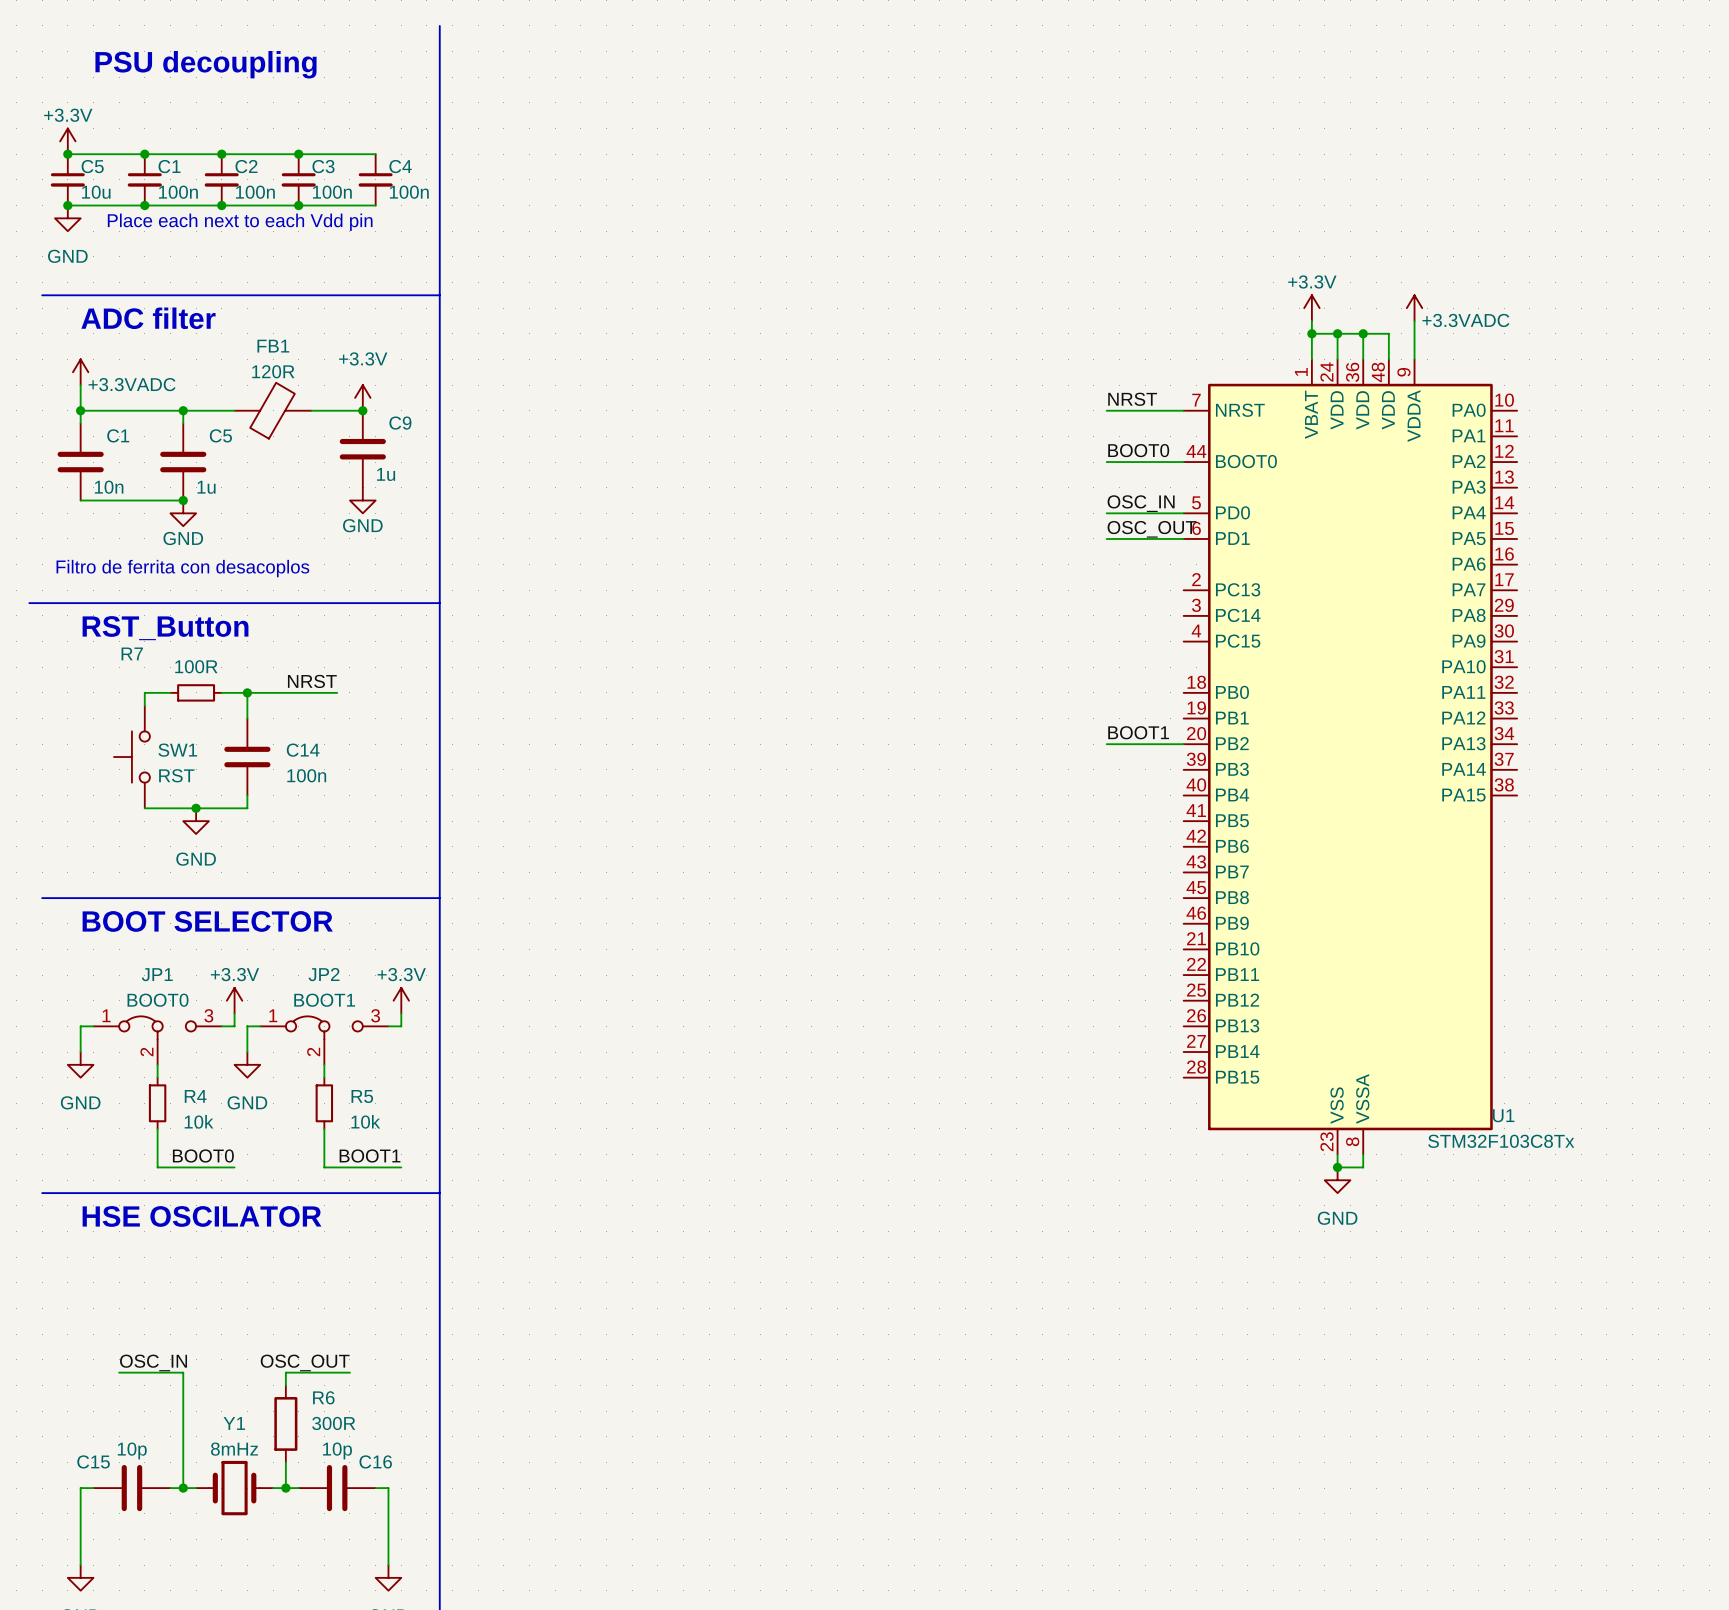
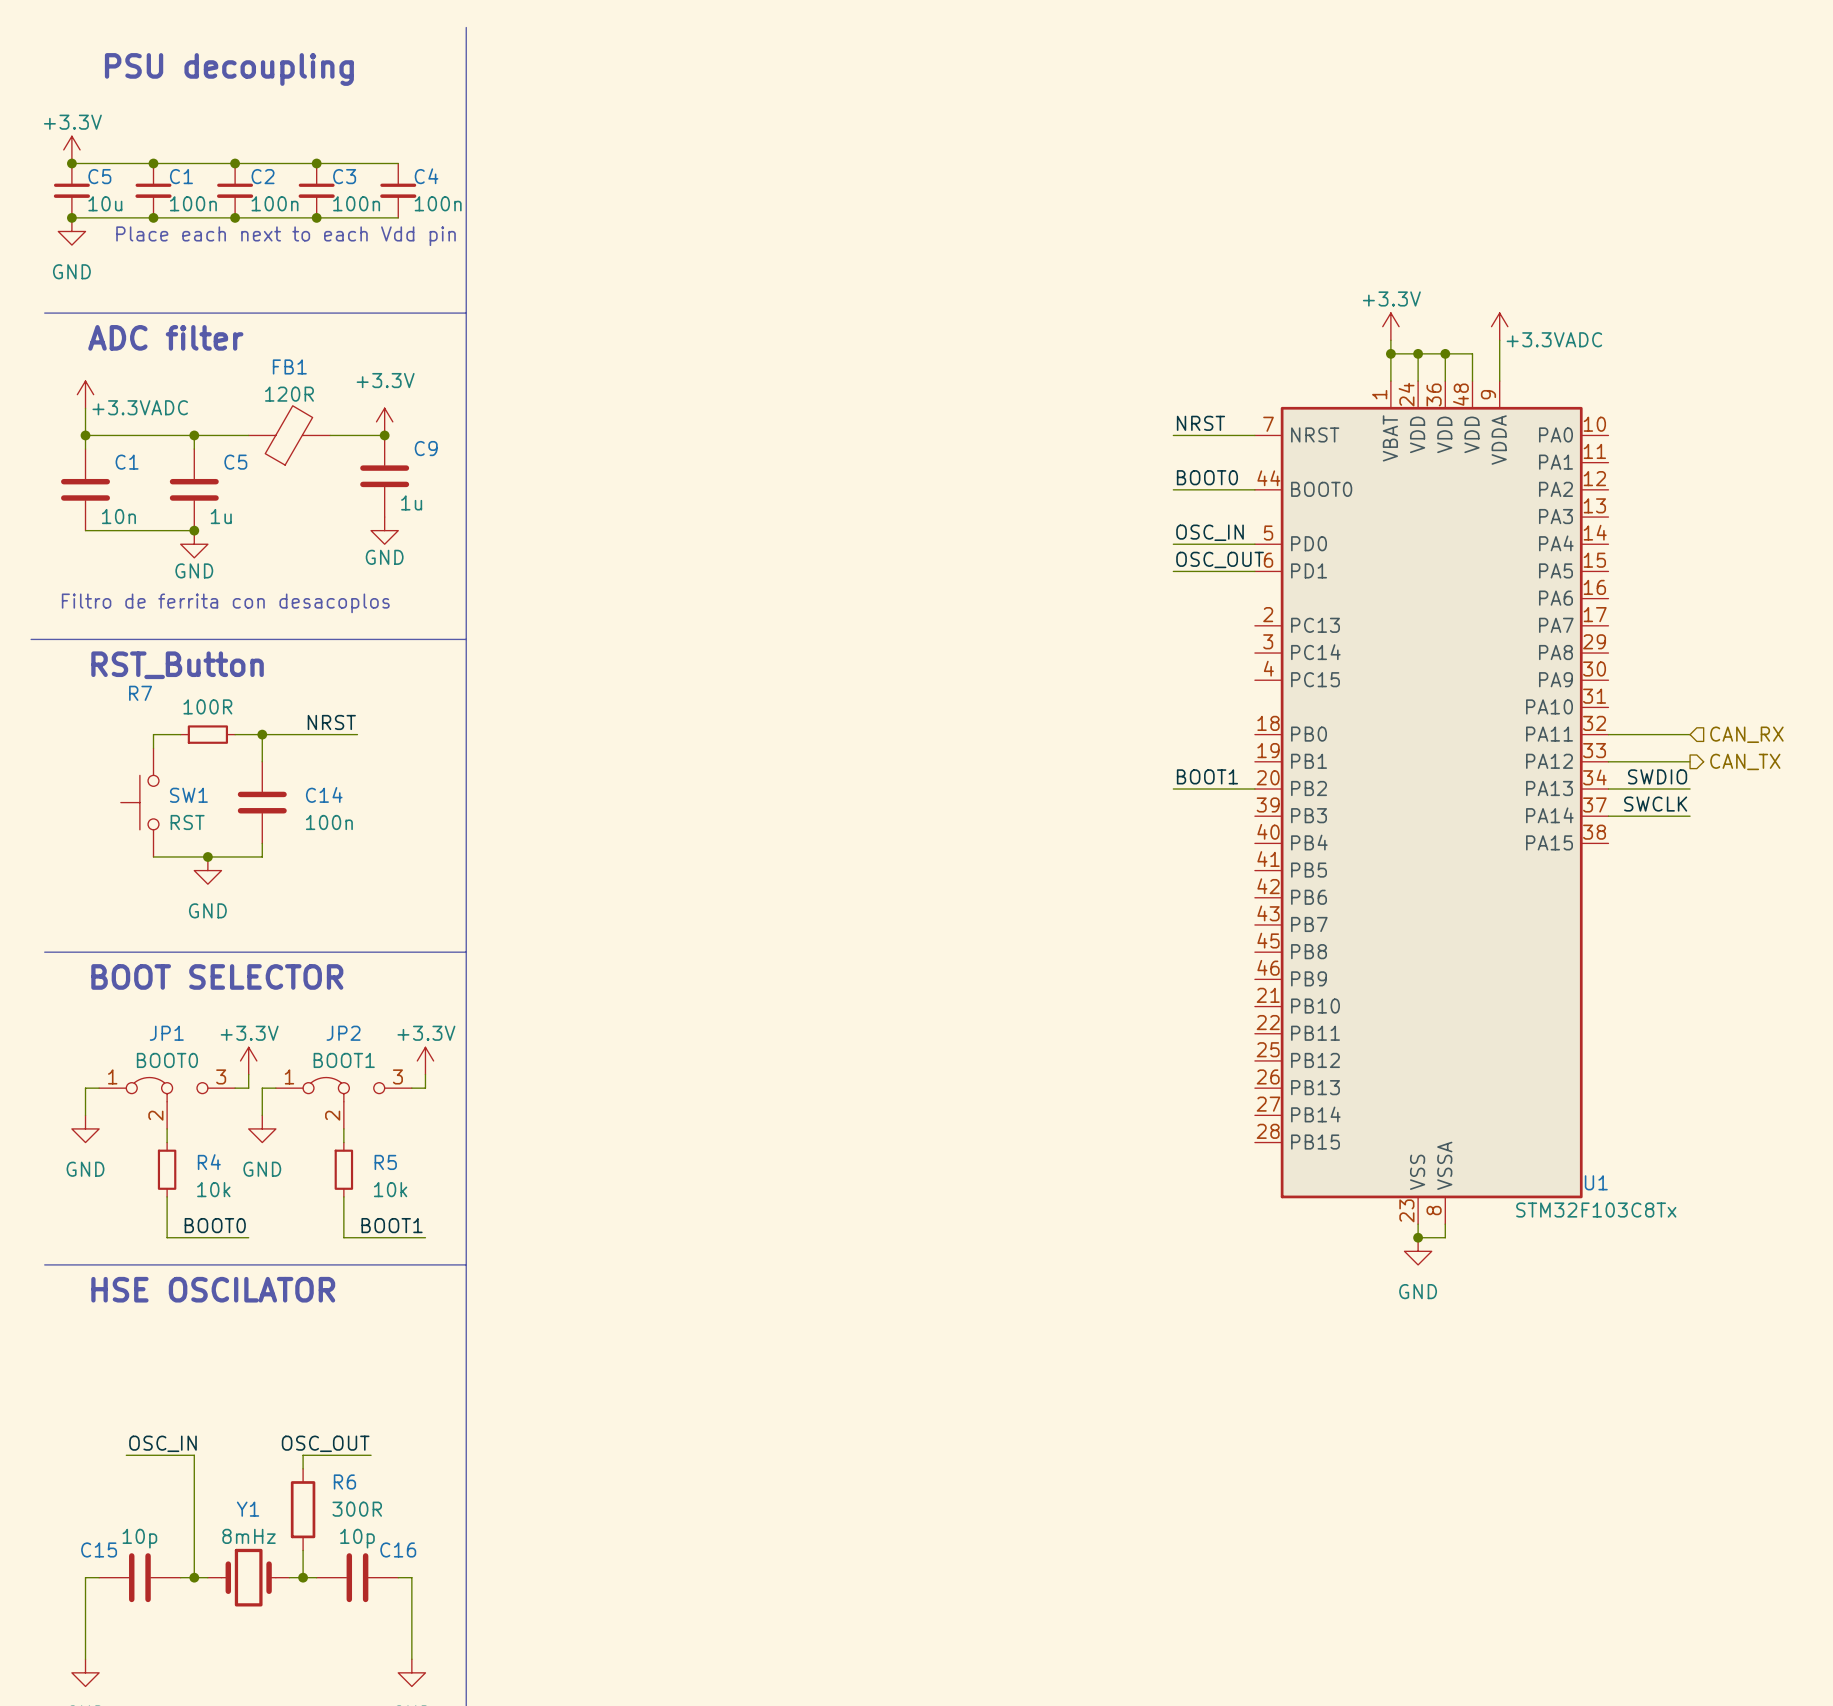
wire: none -> (1608, 734) (1690, 734)
hierarchical label: none -> CAN_RX (1746, 734)
wire: none -> (1608, 761) (1690, 761)
hierarchical label: none -> CAN_TX (1745, 761)
label: none -> SWDIO (1657, 776)
wire: none -> (1608, 789) (1690, 789)
label: none -> SWCLK (1655, 804)
wire: none -> (1608, 816) (1690, 816)

